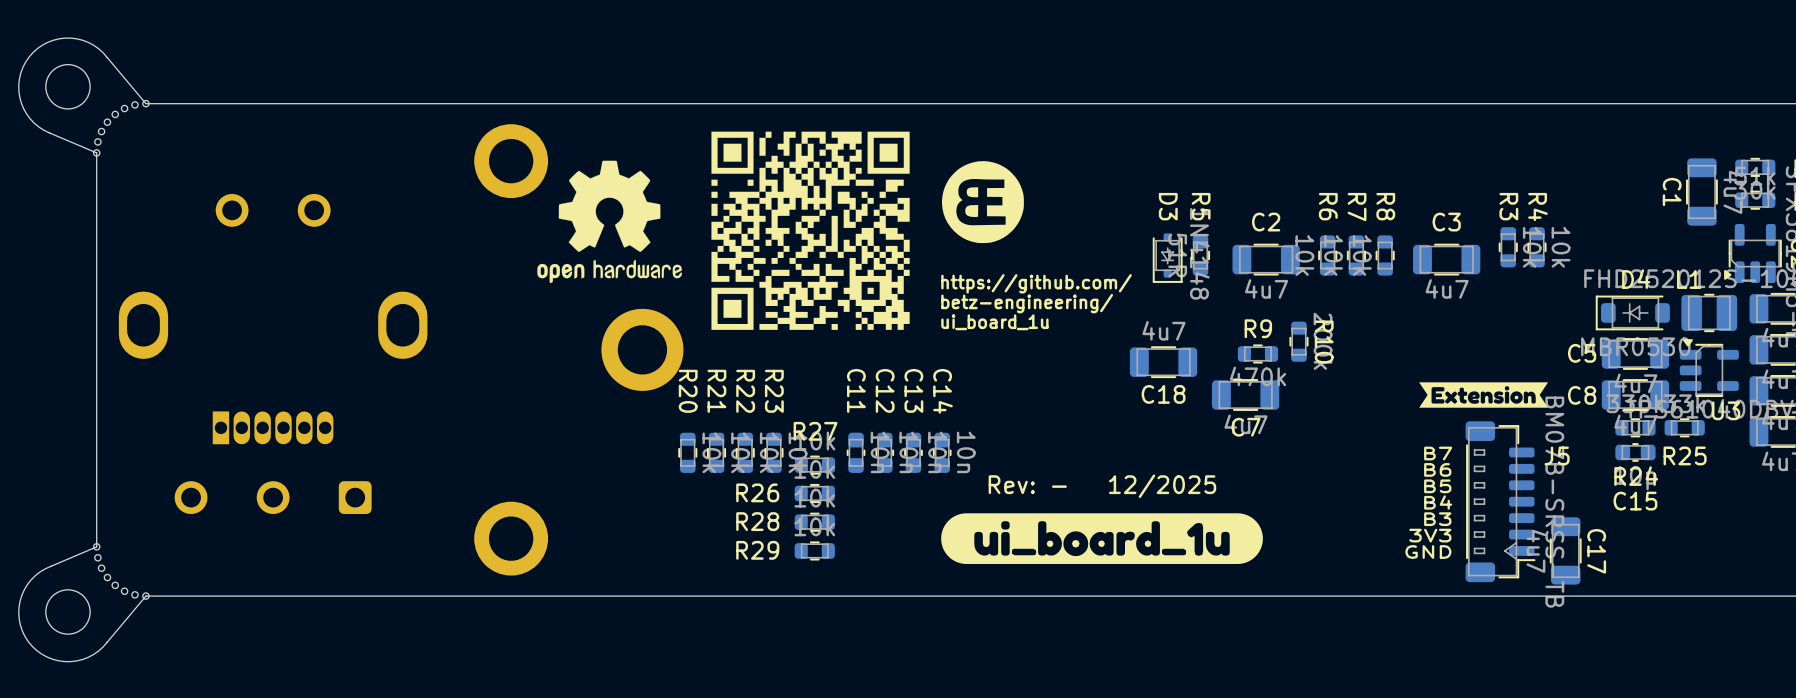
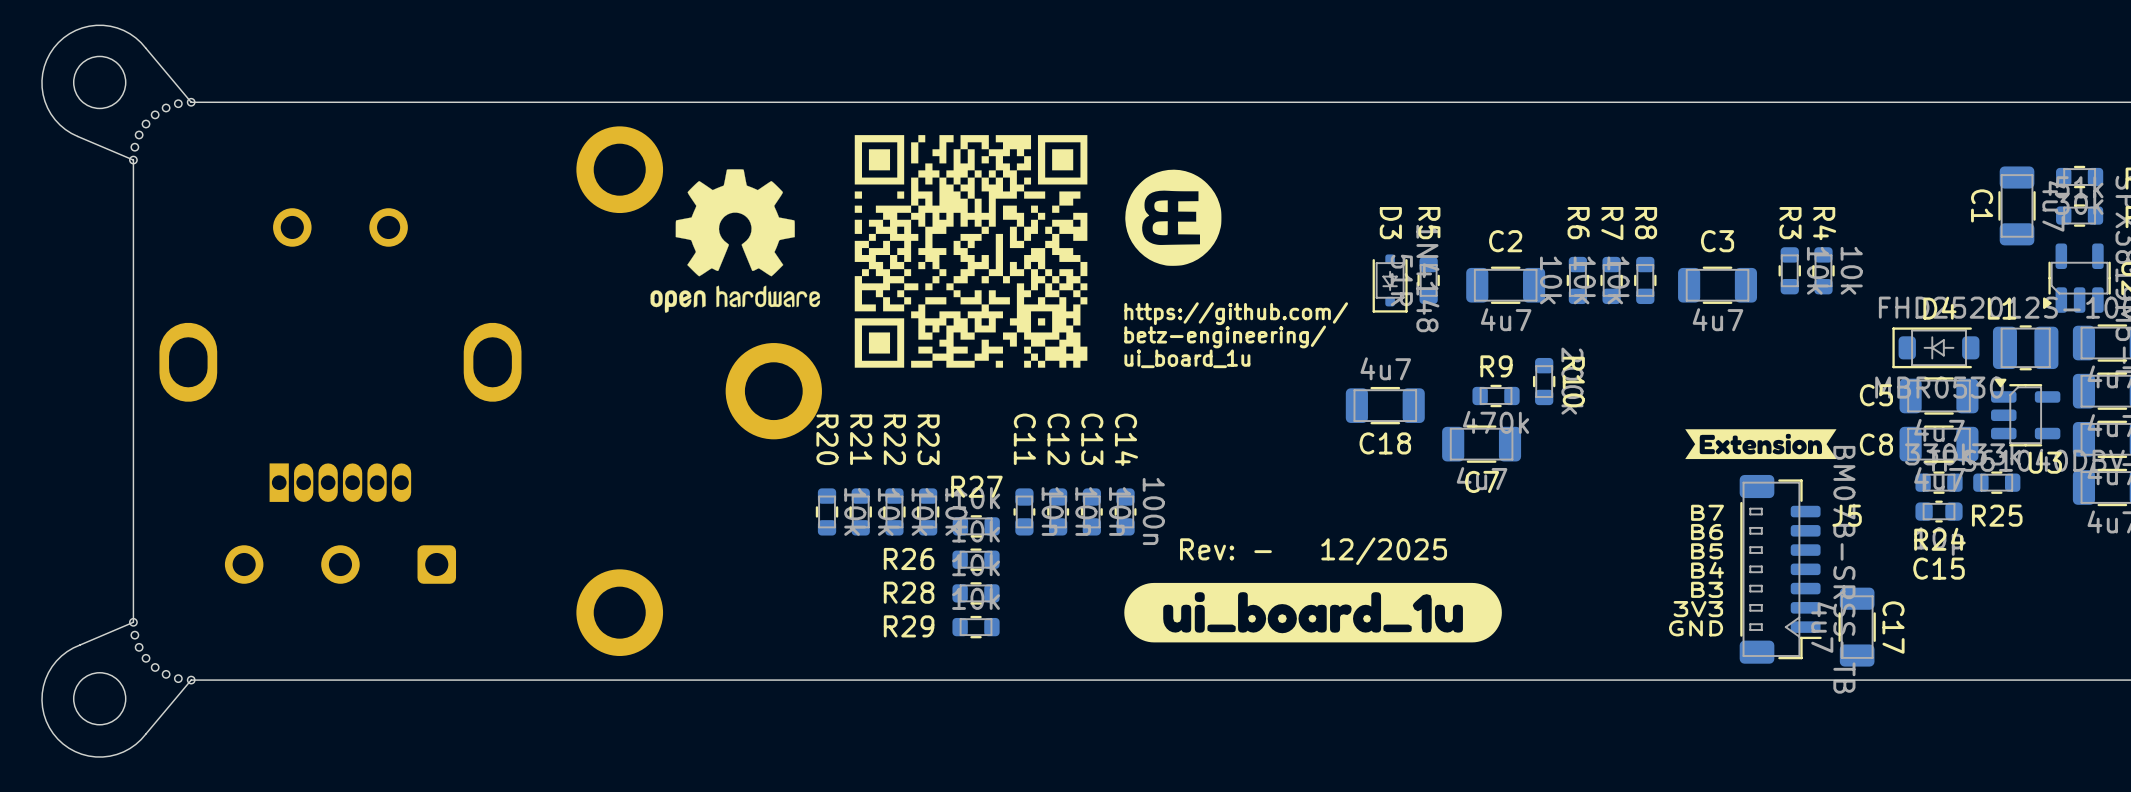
C14 value: 10n (966, 452) -> 100n (1153, 511)

